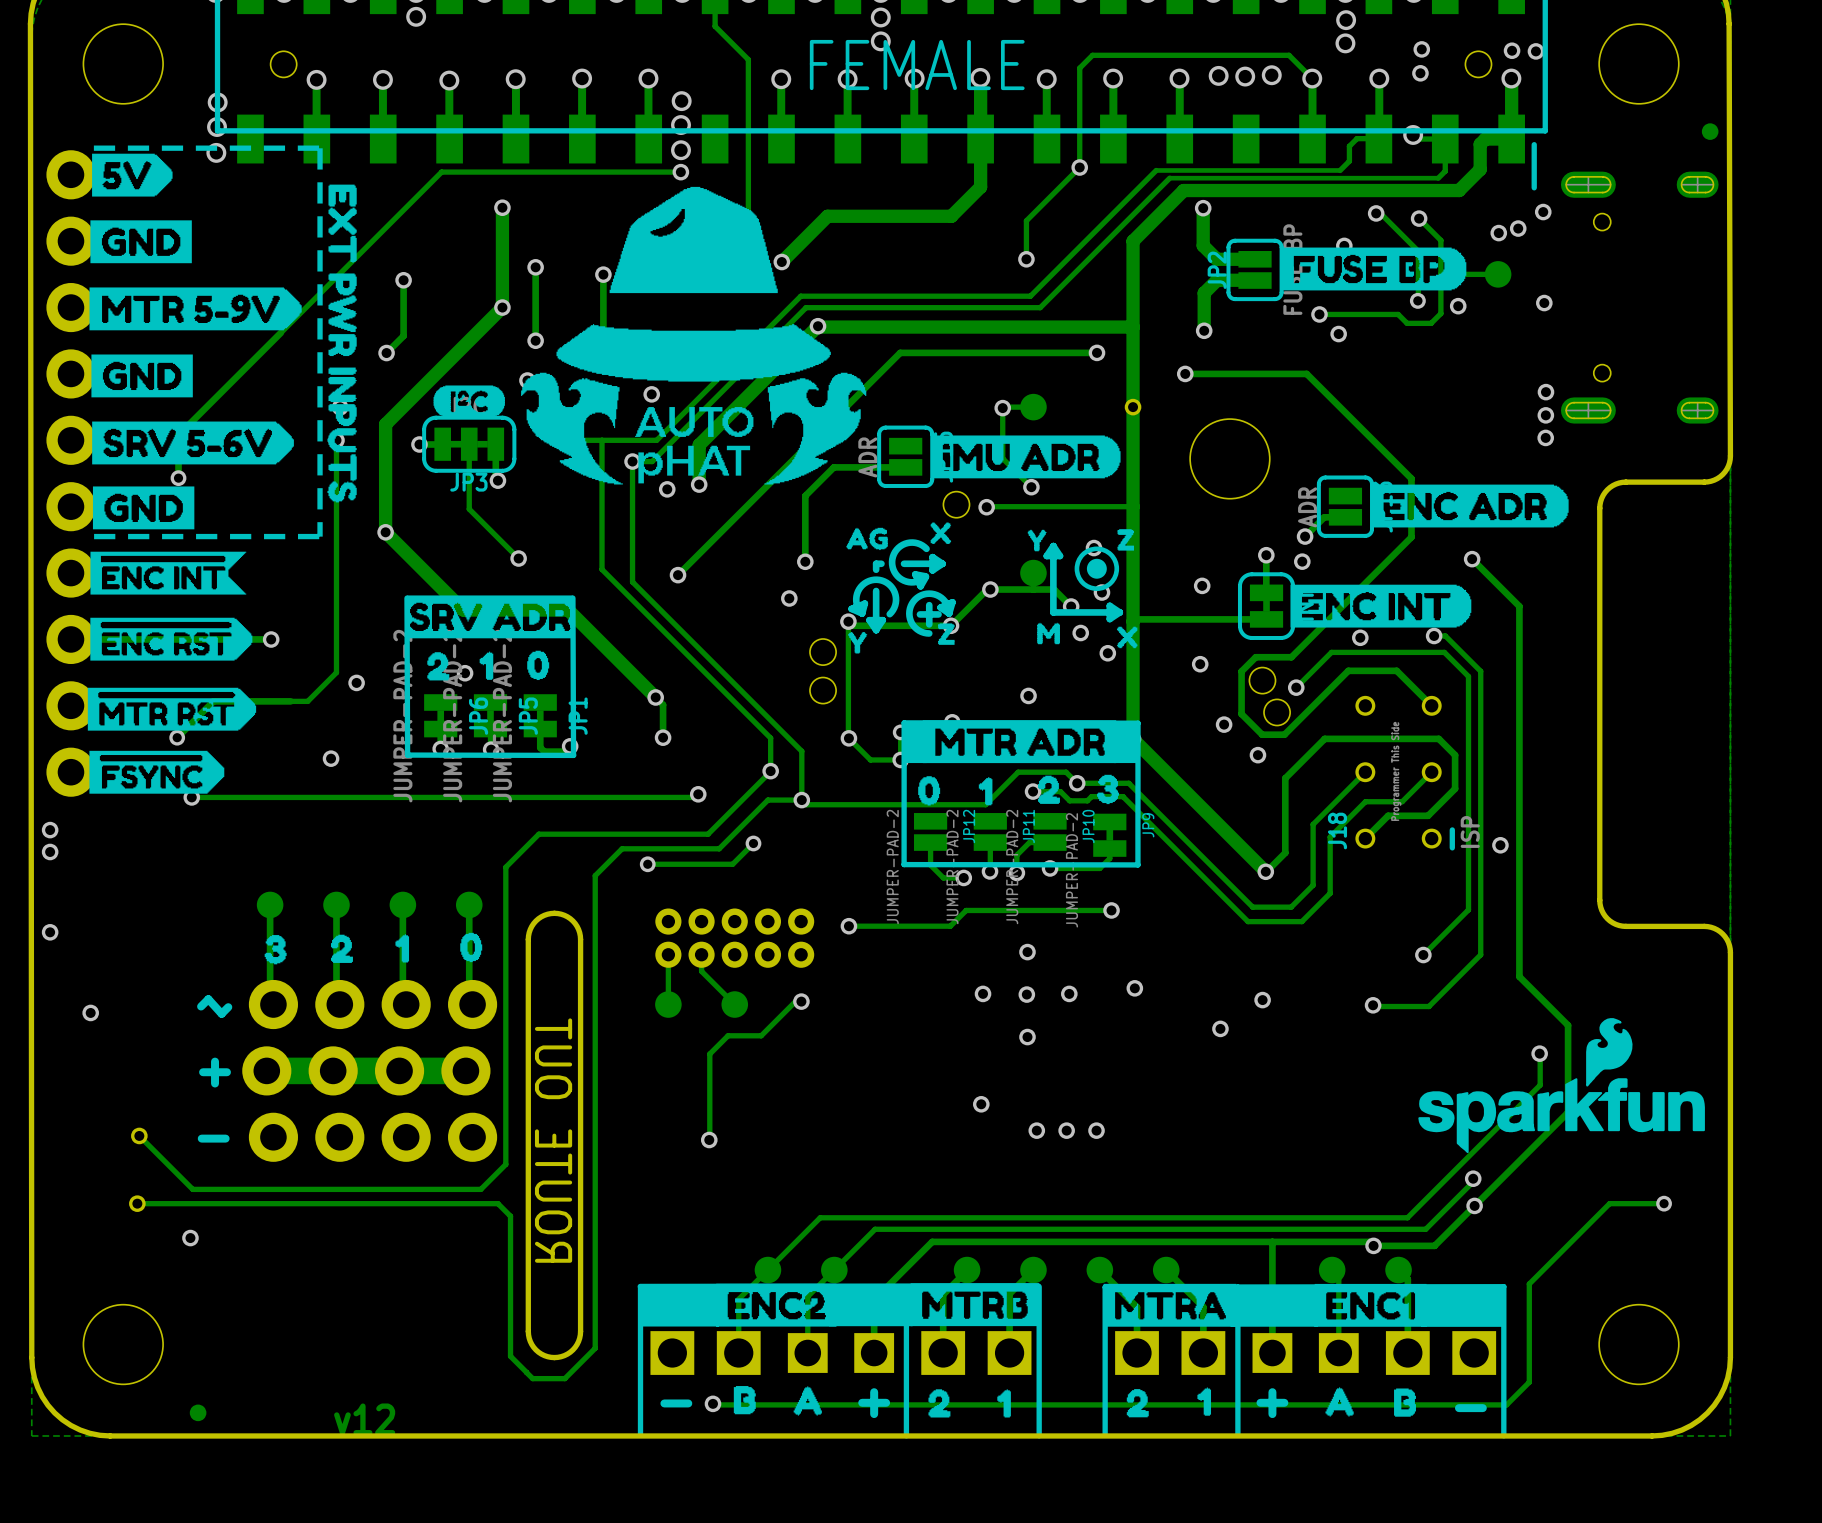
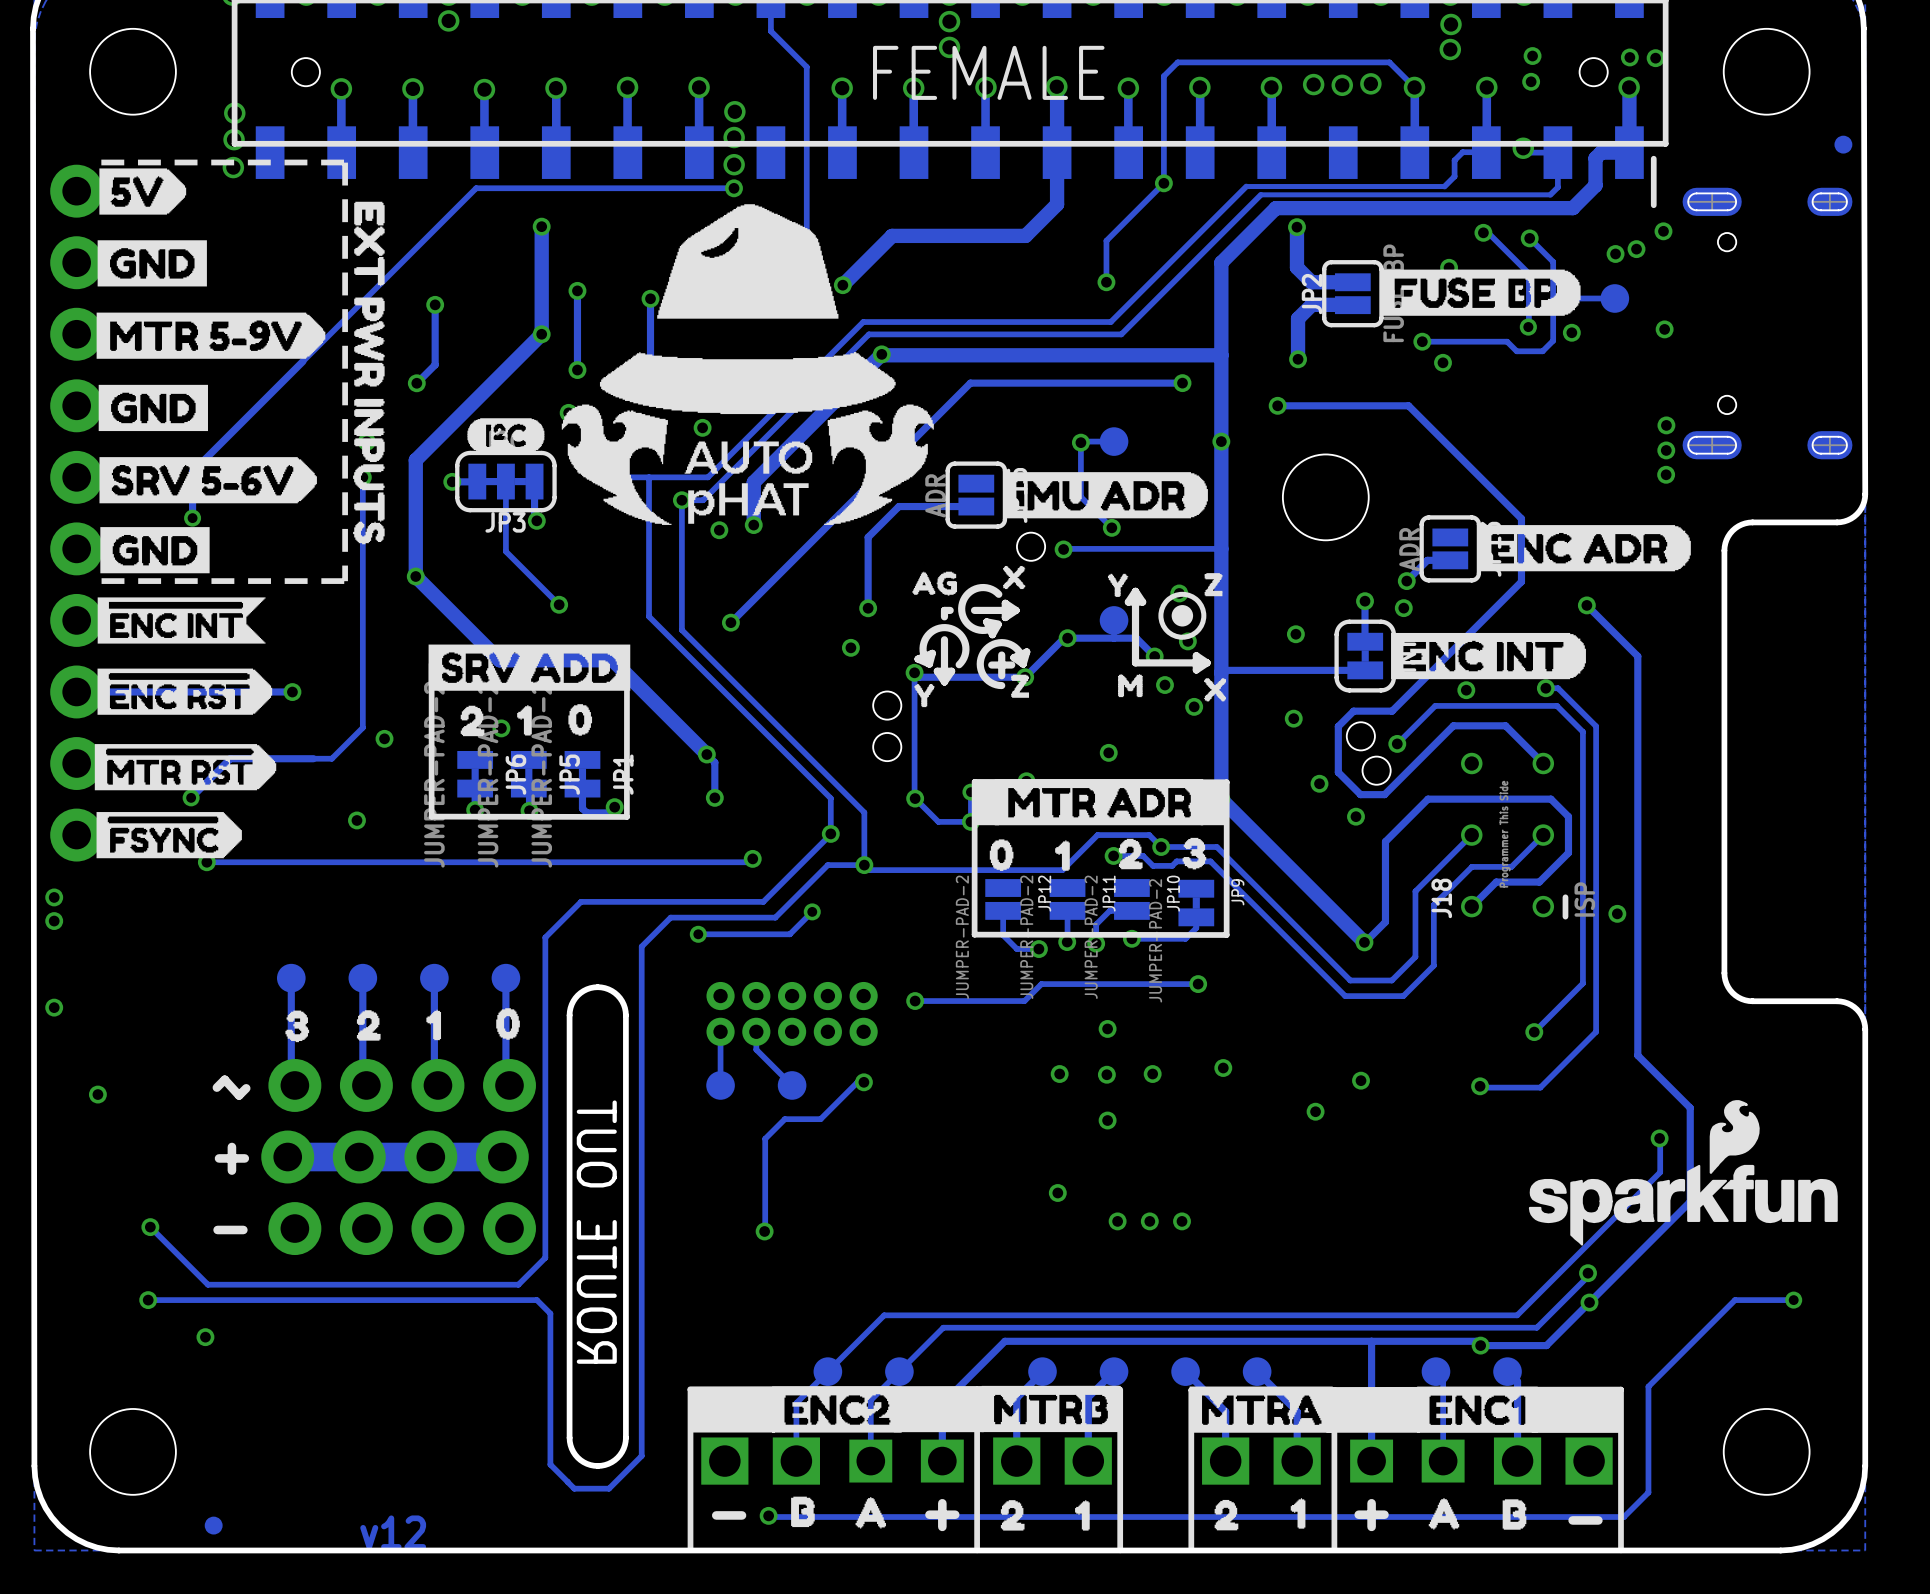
drawing shape: [406, 595, 574, 639] -> [428, 644, 631, 691]
line: (406, 598) (407, 755) (573, 755) -> none
line: (572, 598) (573, 755) -> none
line: none -> (431, 663) (431, 816) (627, 816)
line: none -> (626, 663) (626, 816)

